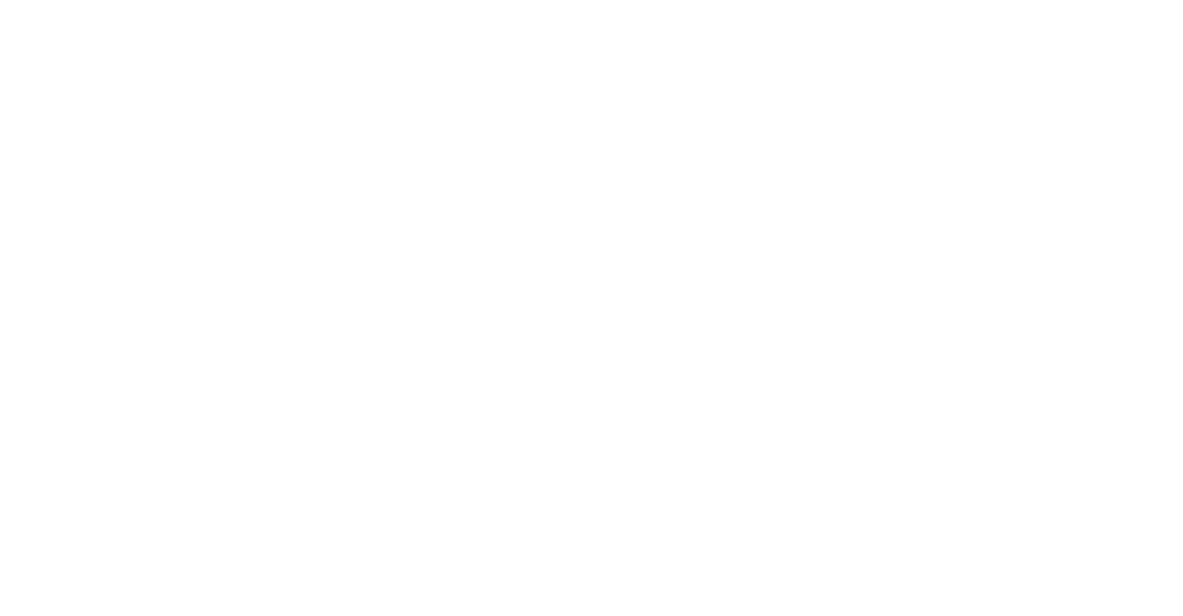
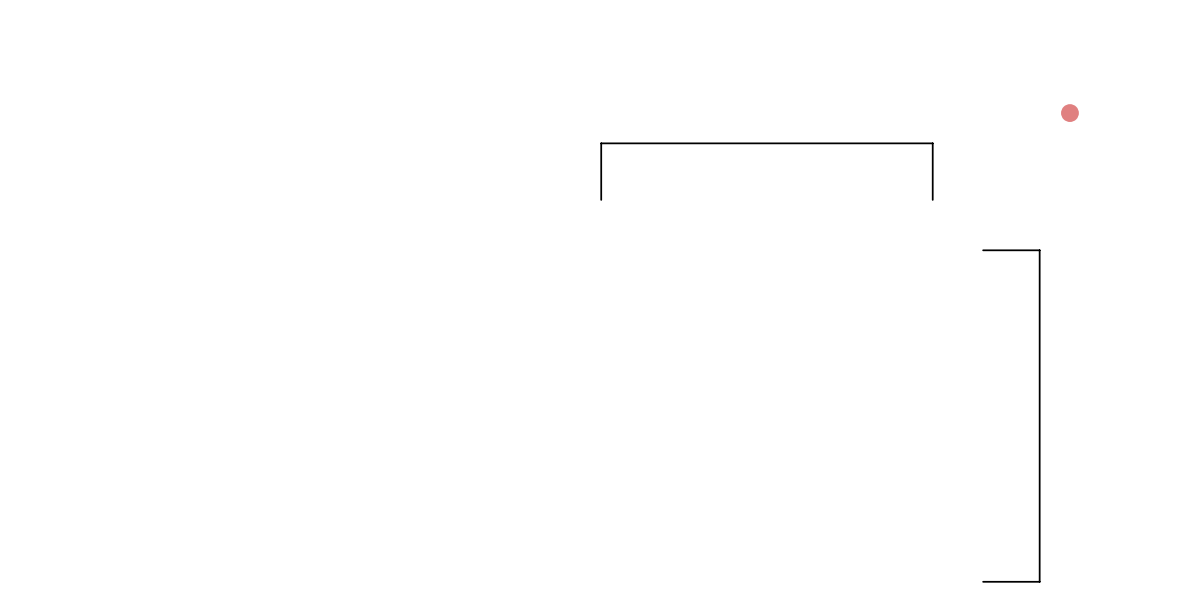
part: none -> (1069, 113)
board edge: none -> (601, 199) (601, 143) (932, 143) (932, 199)
board edge: none -> (983, 250) (1039, 250) (1039, 581) (983, 581)

